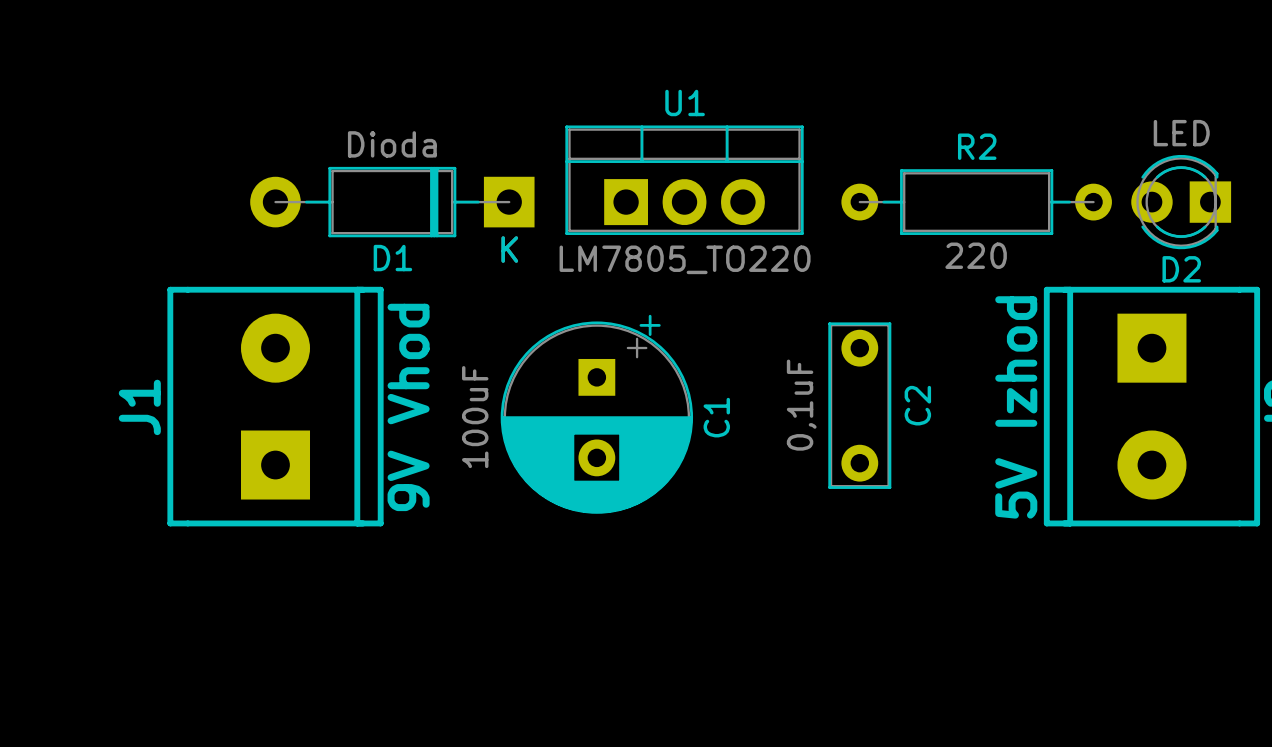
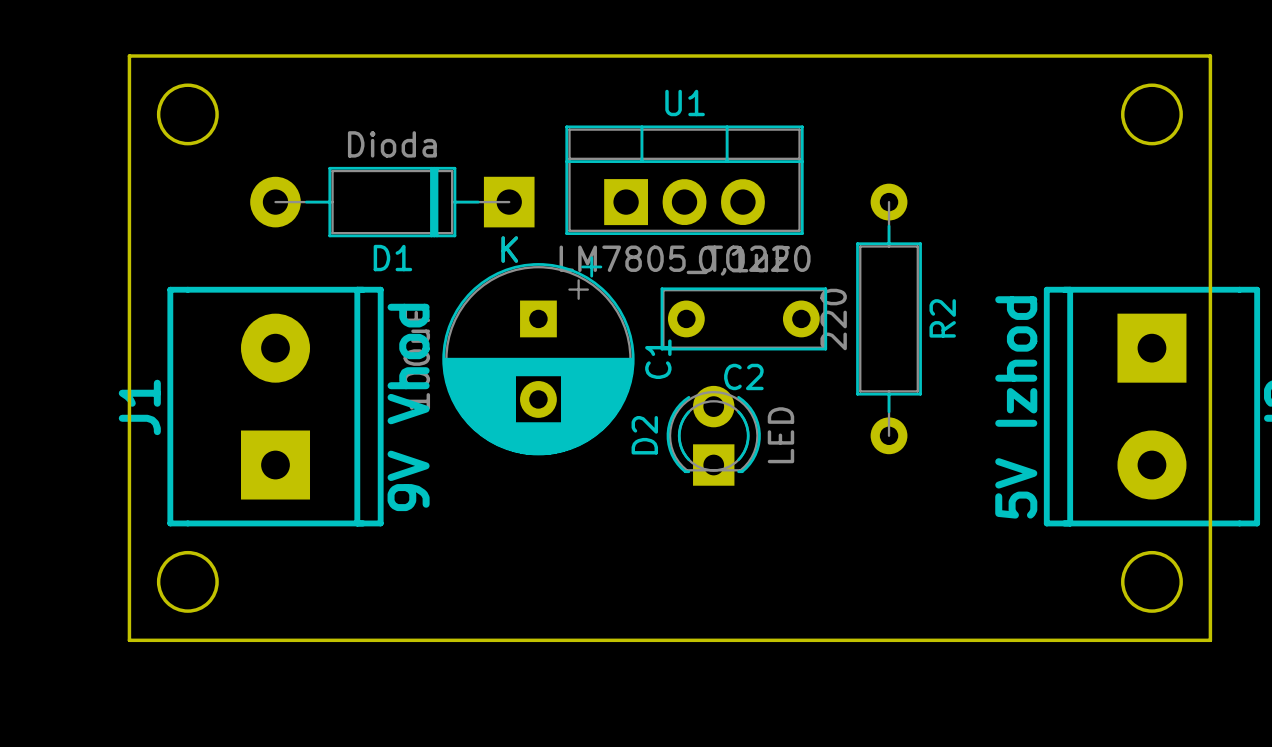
board edge: none -> (129, 56) (129, 640) (1210, 640) (1210, 56) (129, 56)
round board edge: none -> [156, 83, 219, 146]
round board edge: none -> [1121, 83, 1183, 146]
R2 rotation: 0° (976, 202) -> 90° clockwise (889, 318)
D2 rotation: 0° (1181, 202) -> 90° clockwise (713, 435)
D2 position: (1181, 202) -> (713, 435)
C2 rotation: 0° (859, 405) -> 90° clockwise (743, 318)
C2 position: (859, 405) -> (743, 318)
C1 position: (596, 414) -> (538, 355)
round board edge: none -> [156, 550, 219, 613]
round board edge: none -> [1121, 550, 1183, 613]

